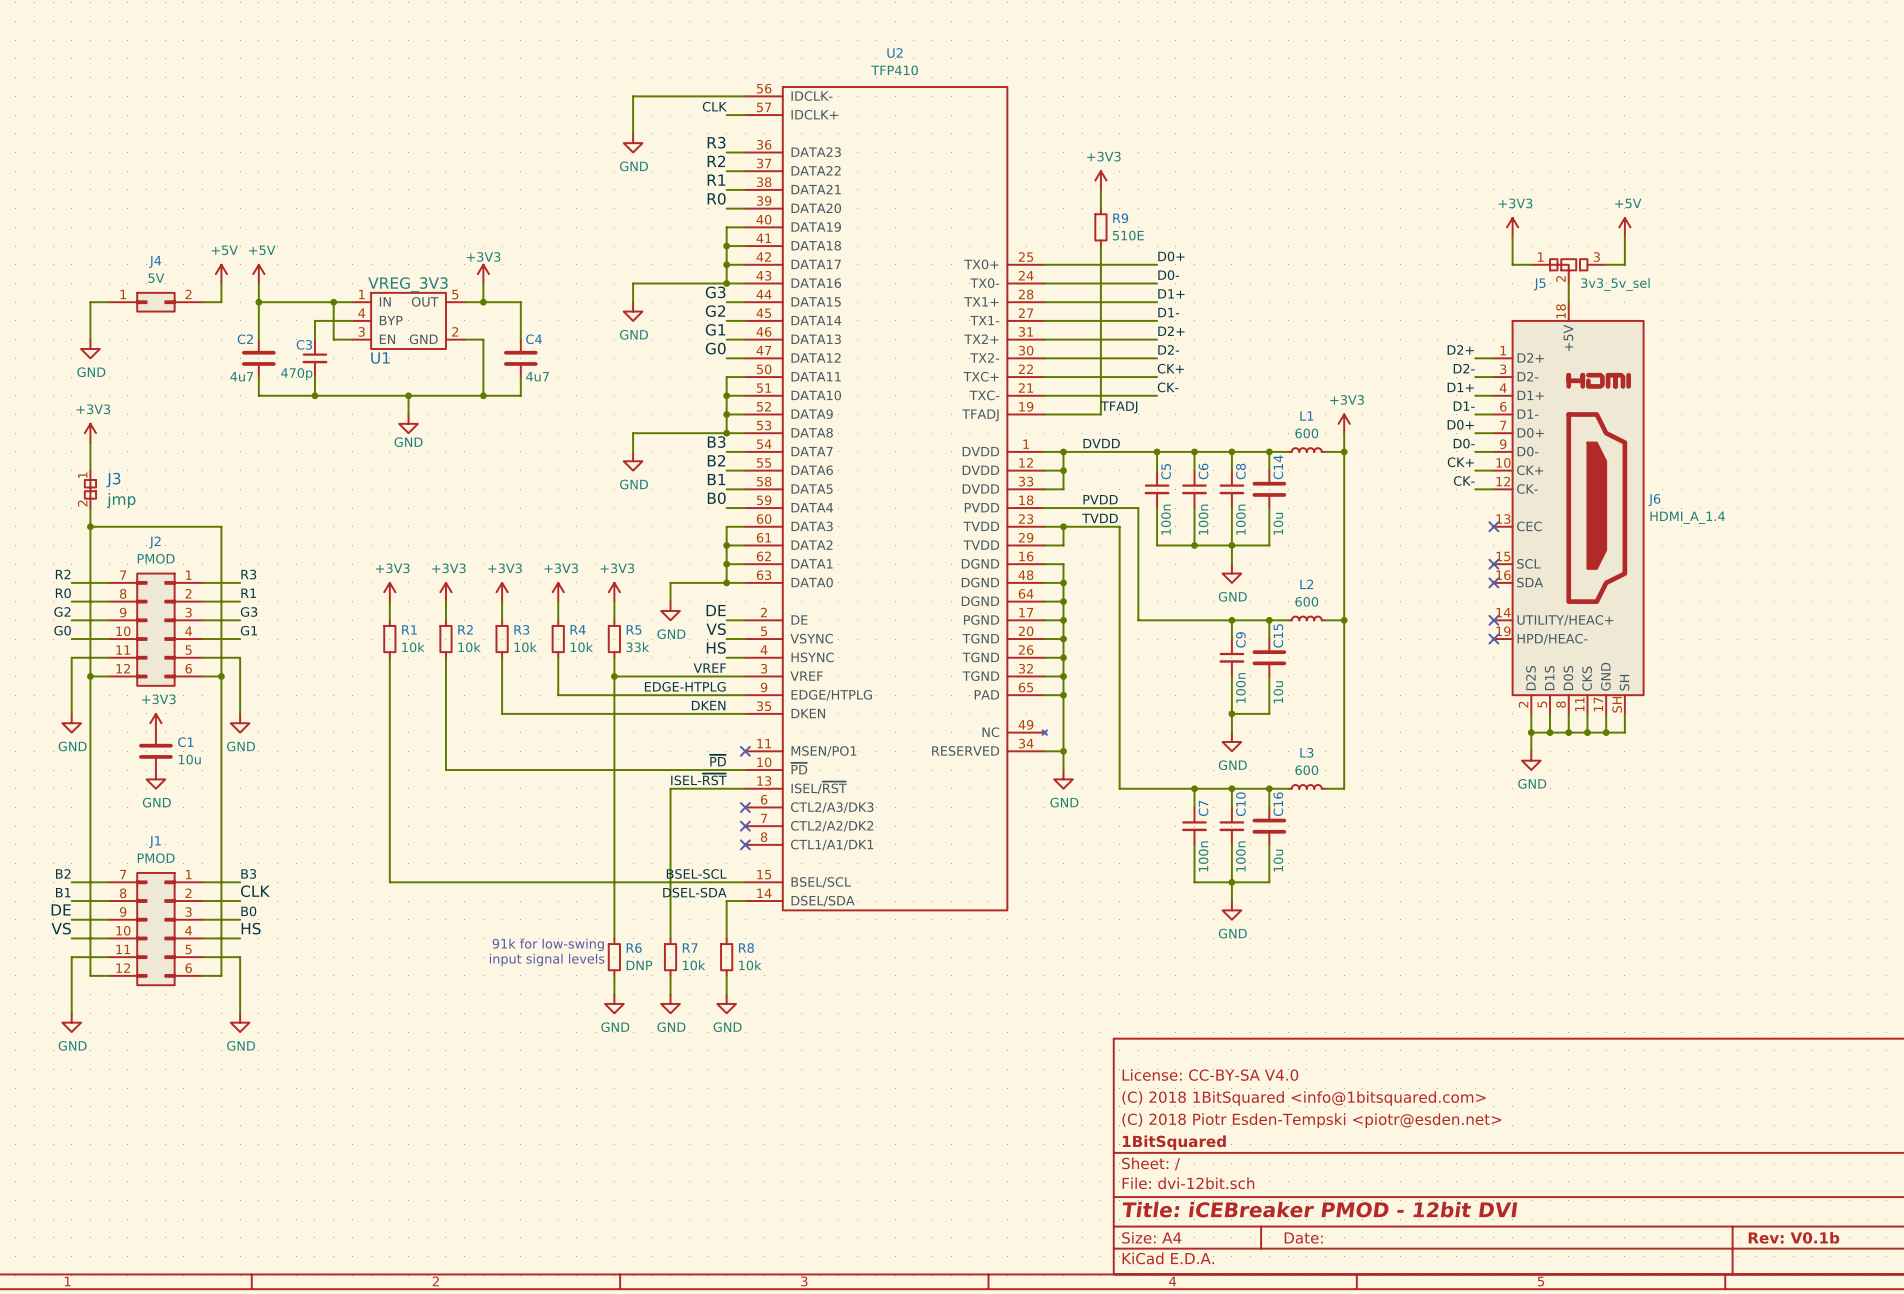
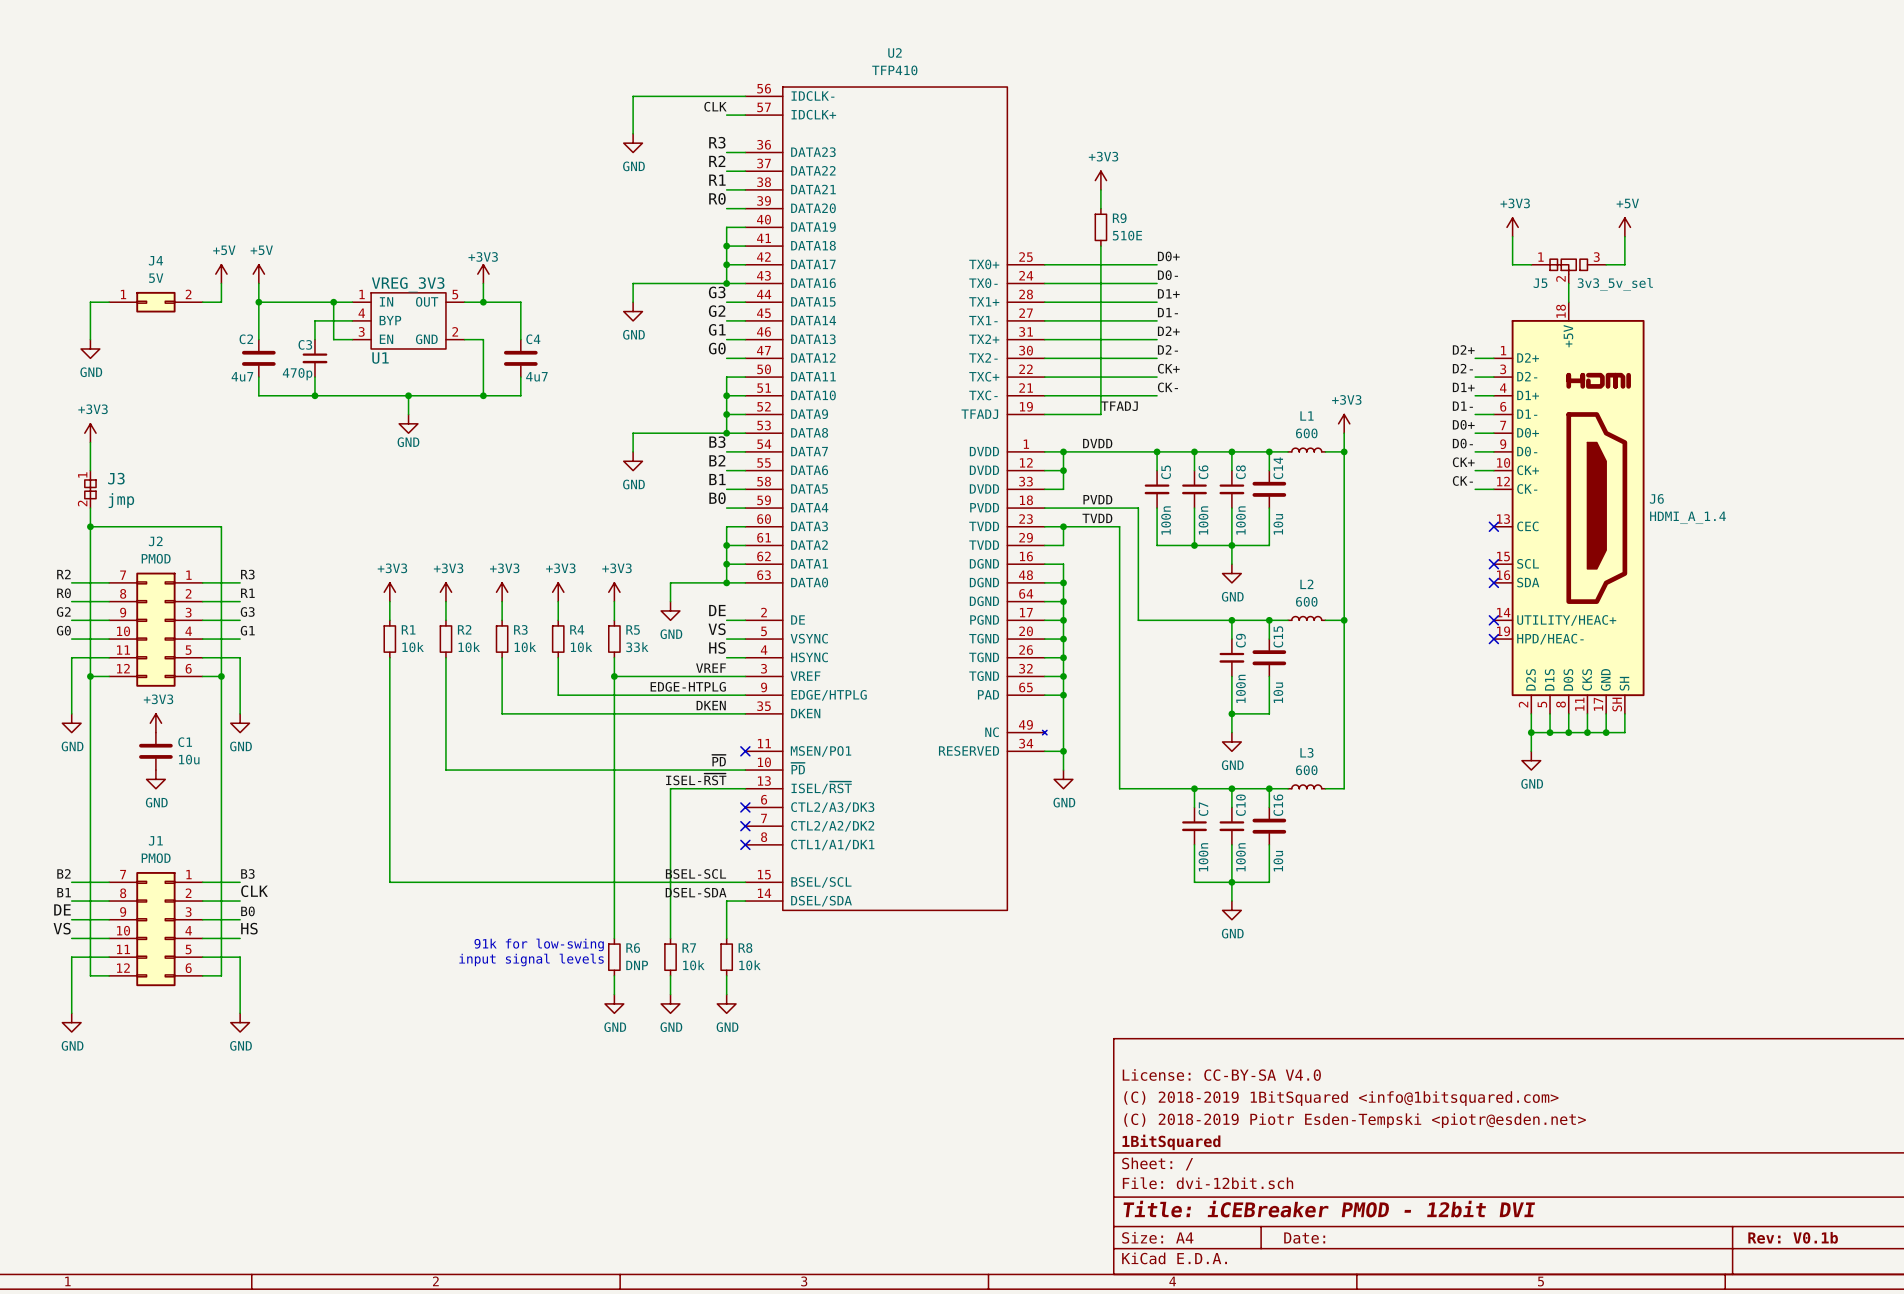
title block: (C) 2018 1BitSquared <info@1bitsquared.com> (1304, 1098) -> (C) 2018-2019 1BitSquared <info@1bitsquared.com> (1341, 1098)
title block: (C) 2018 Piotr Esden-Tempski <piotr@esden.net> (1311, 1120) -> (C) 2018-2019 Piotr Esden-Tempski <piotr@esden.net> (1355, 1120)

